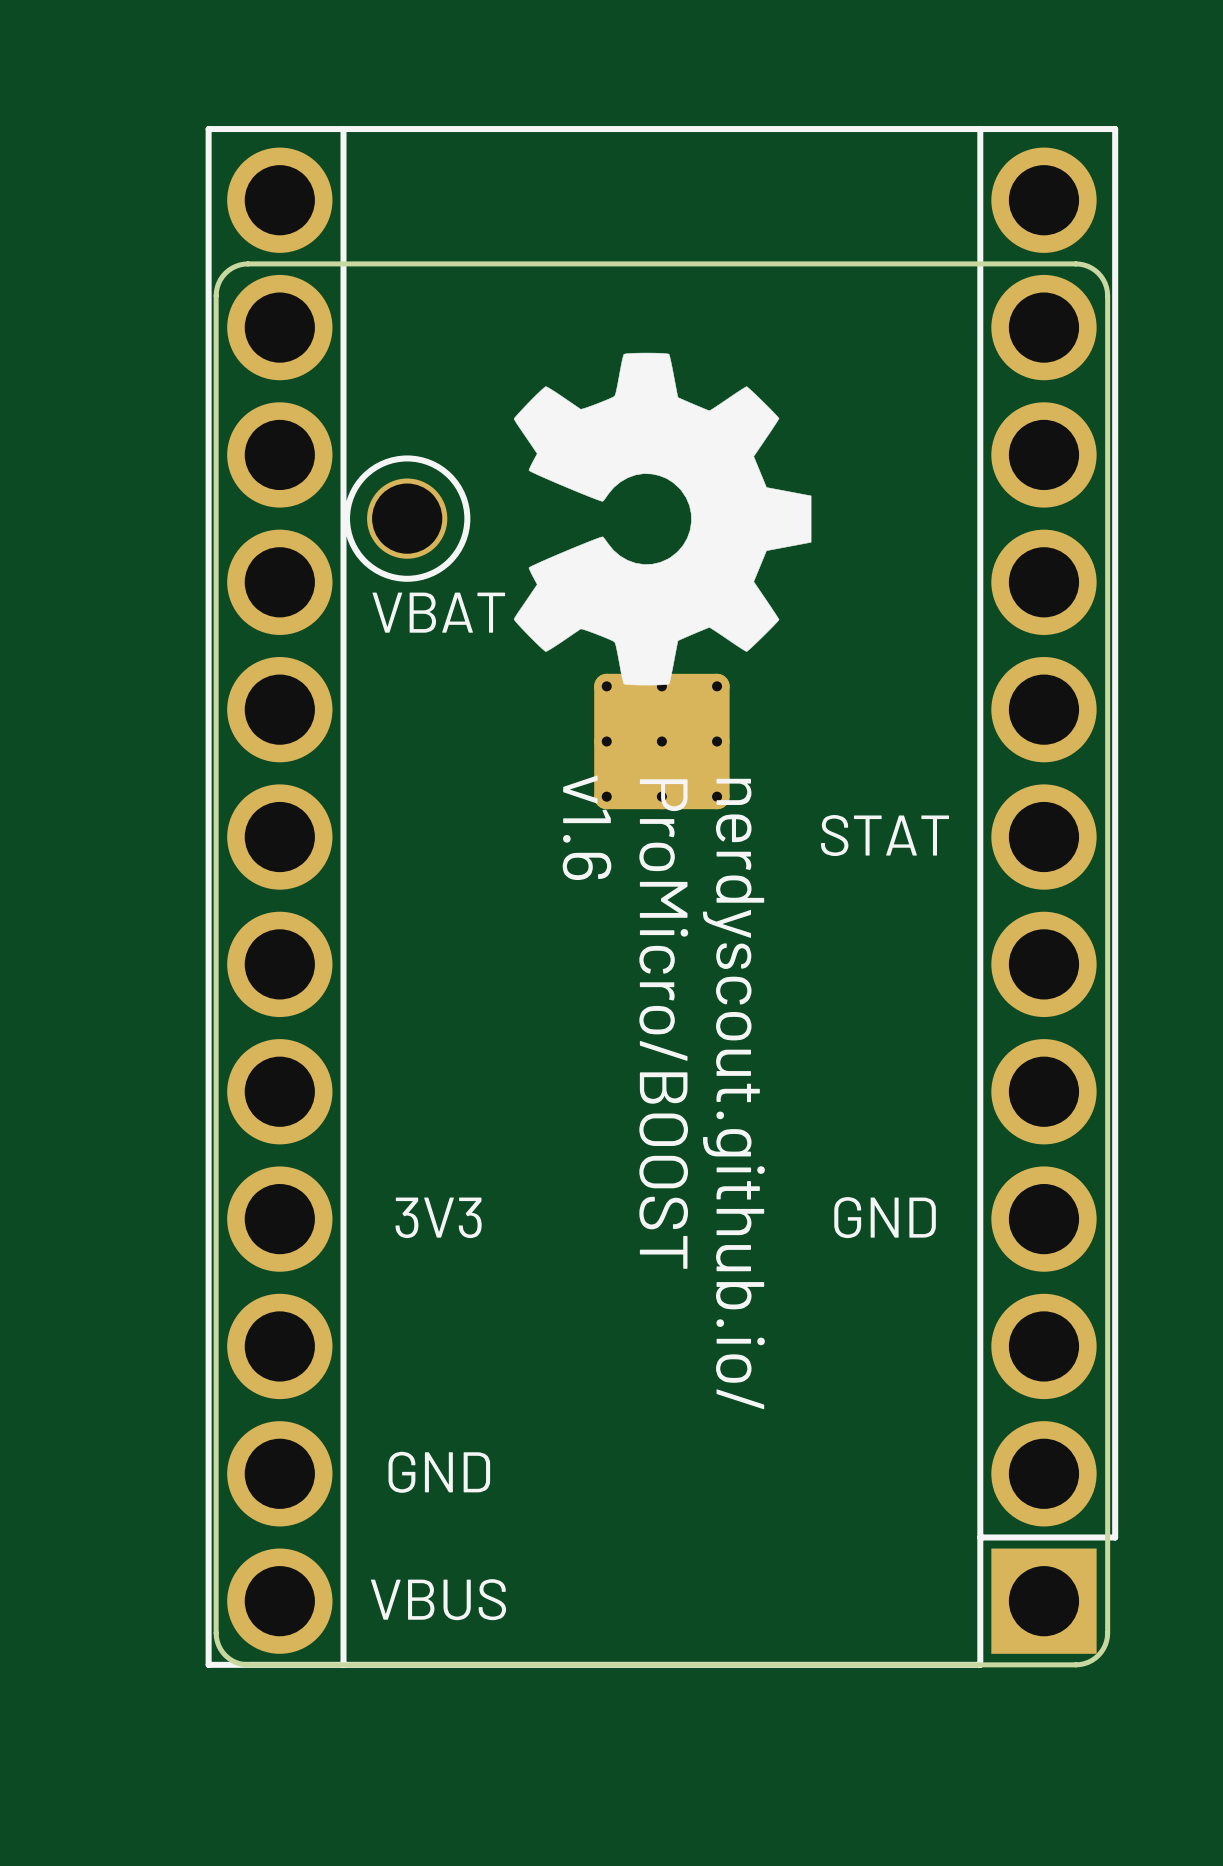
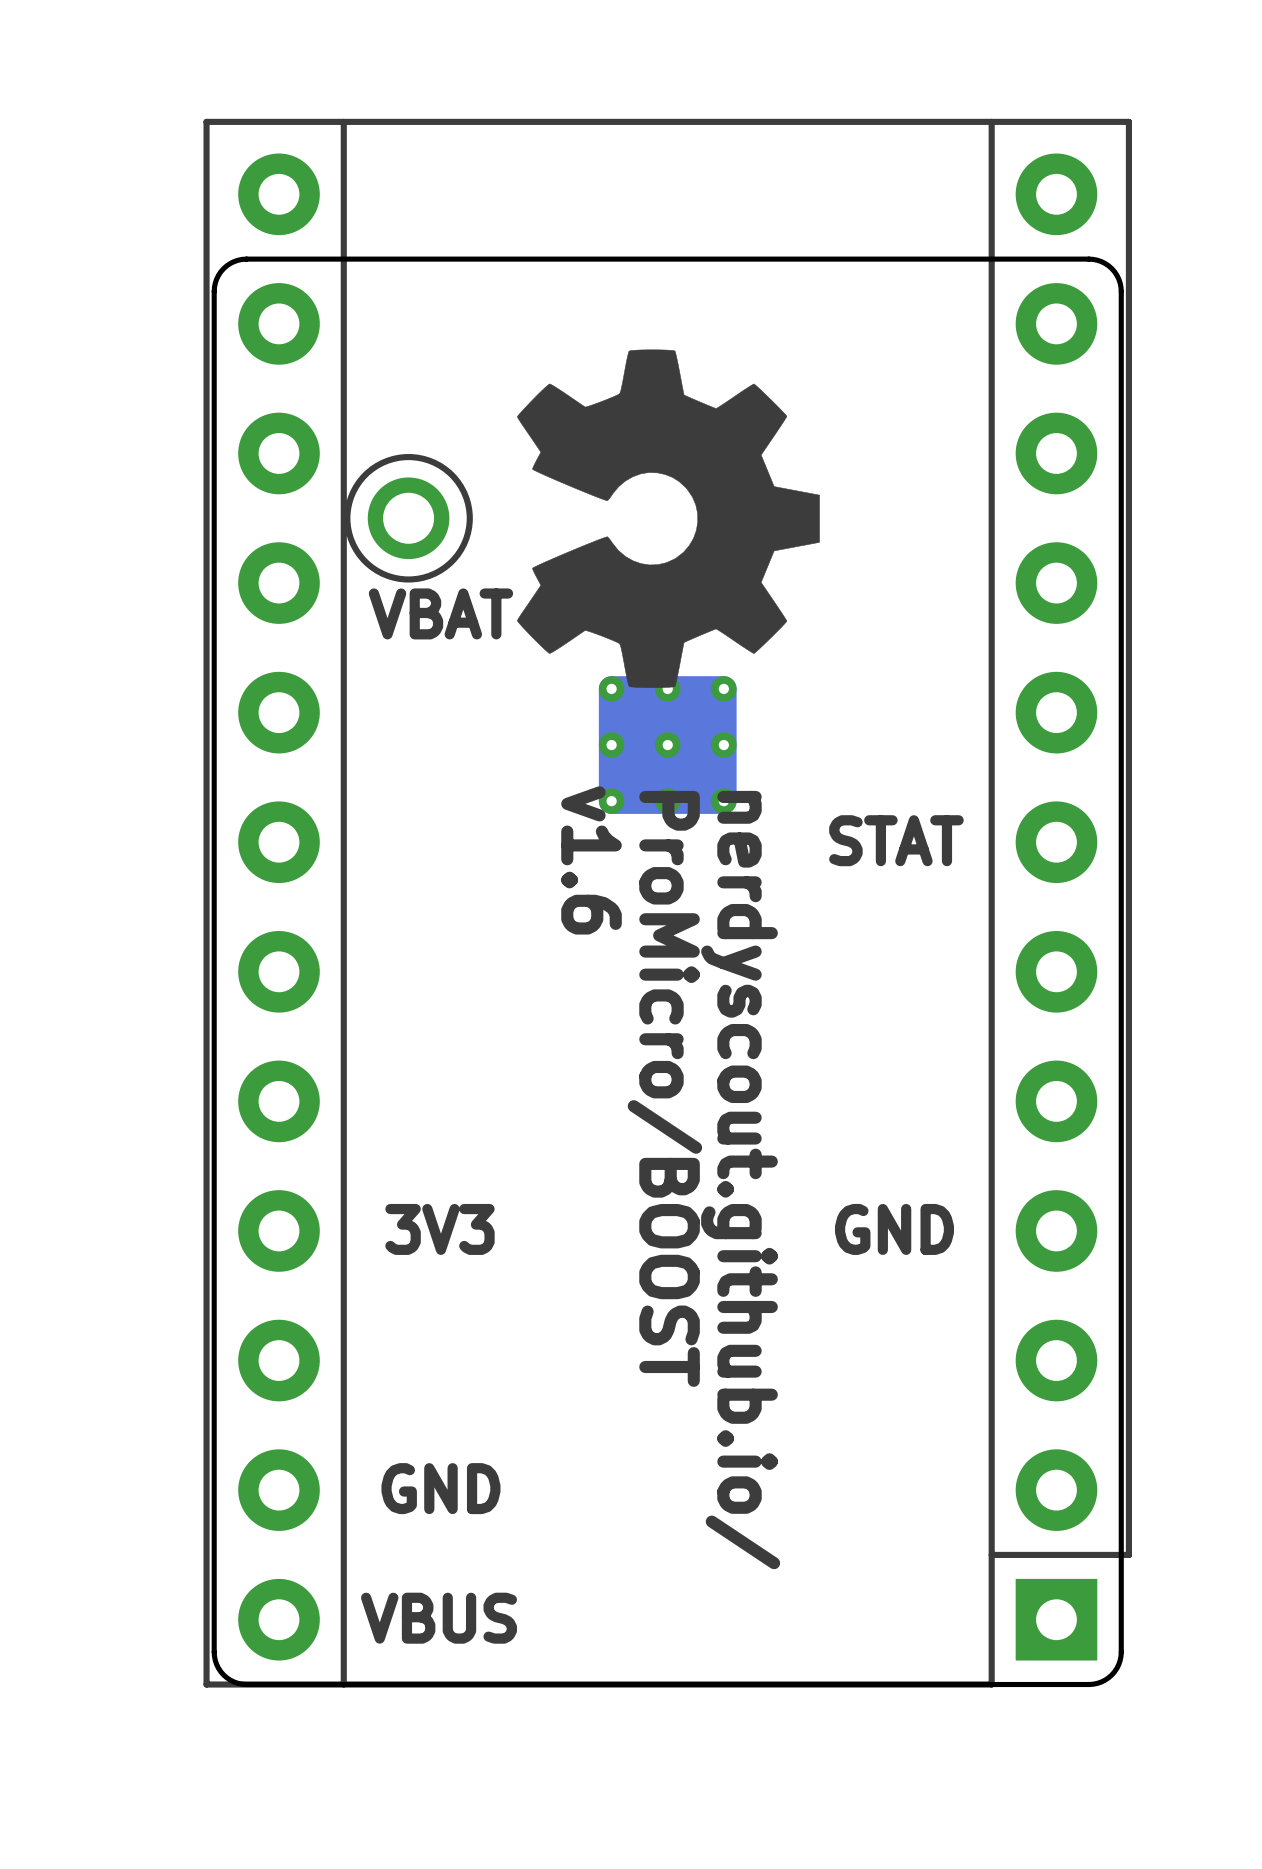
part footprint: [205, 126, 1119, 1668] -> [203, 118, 1132, 1688]
part footprint: [344, 455, 471, 582] -> [344, 453, 473, 583]

